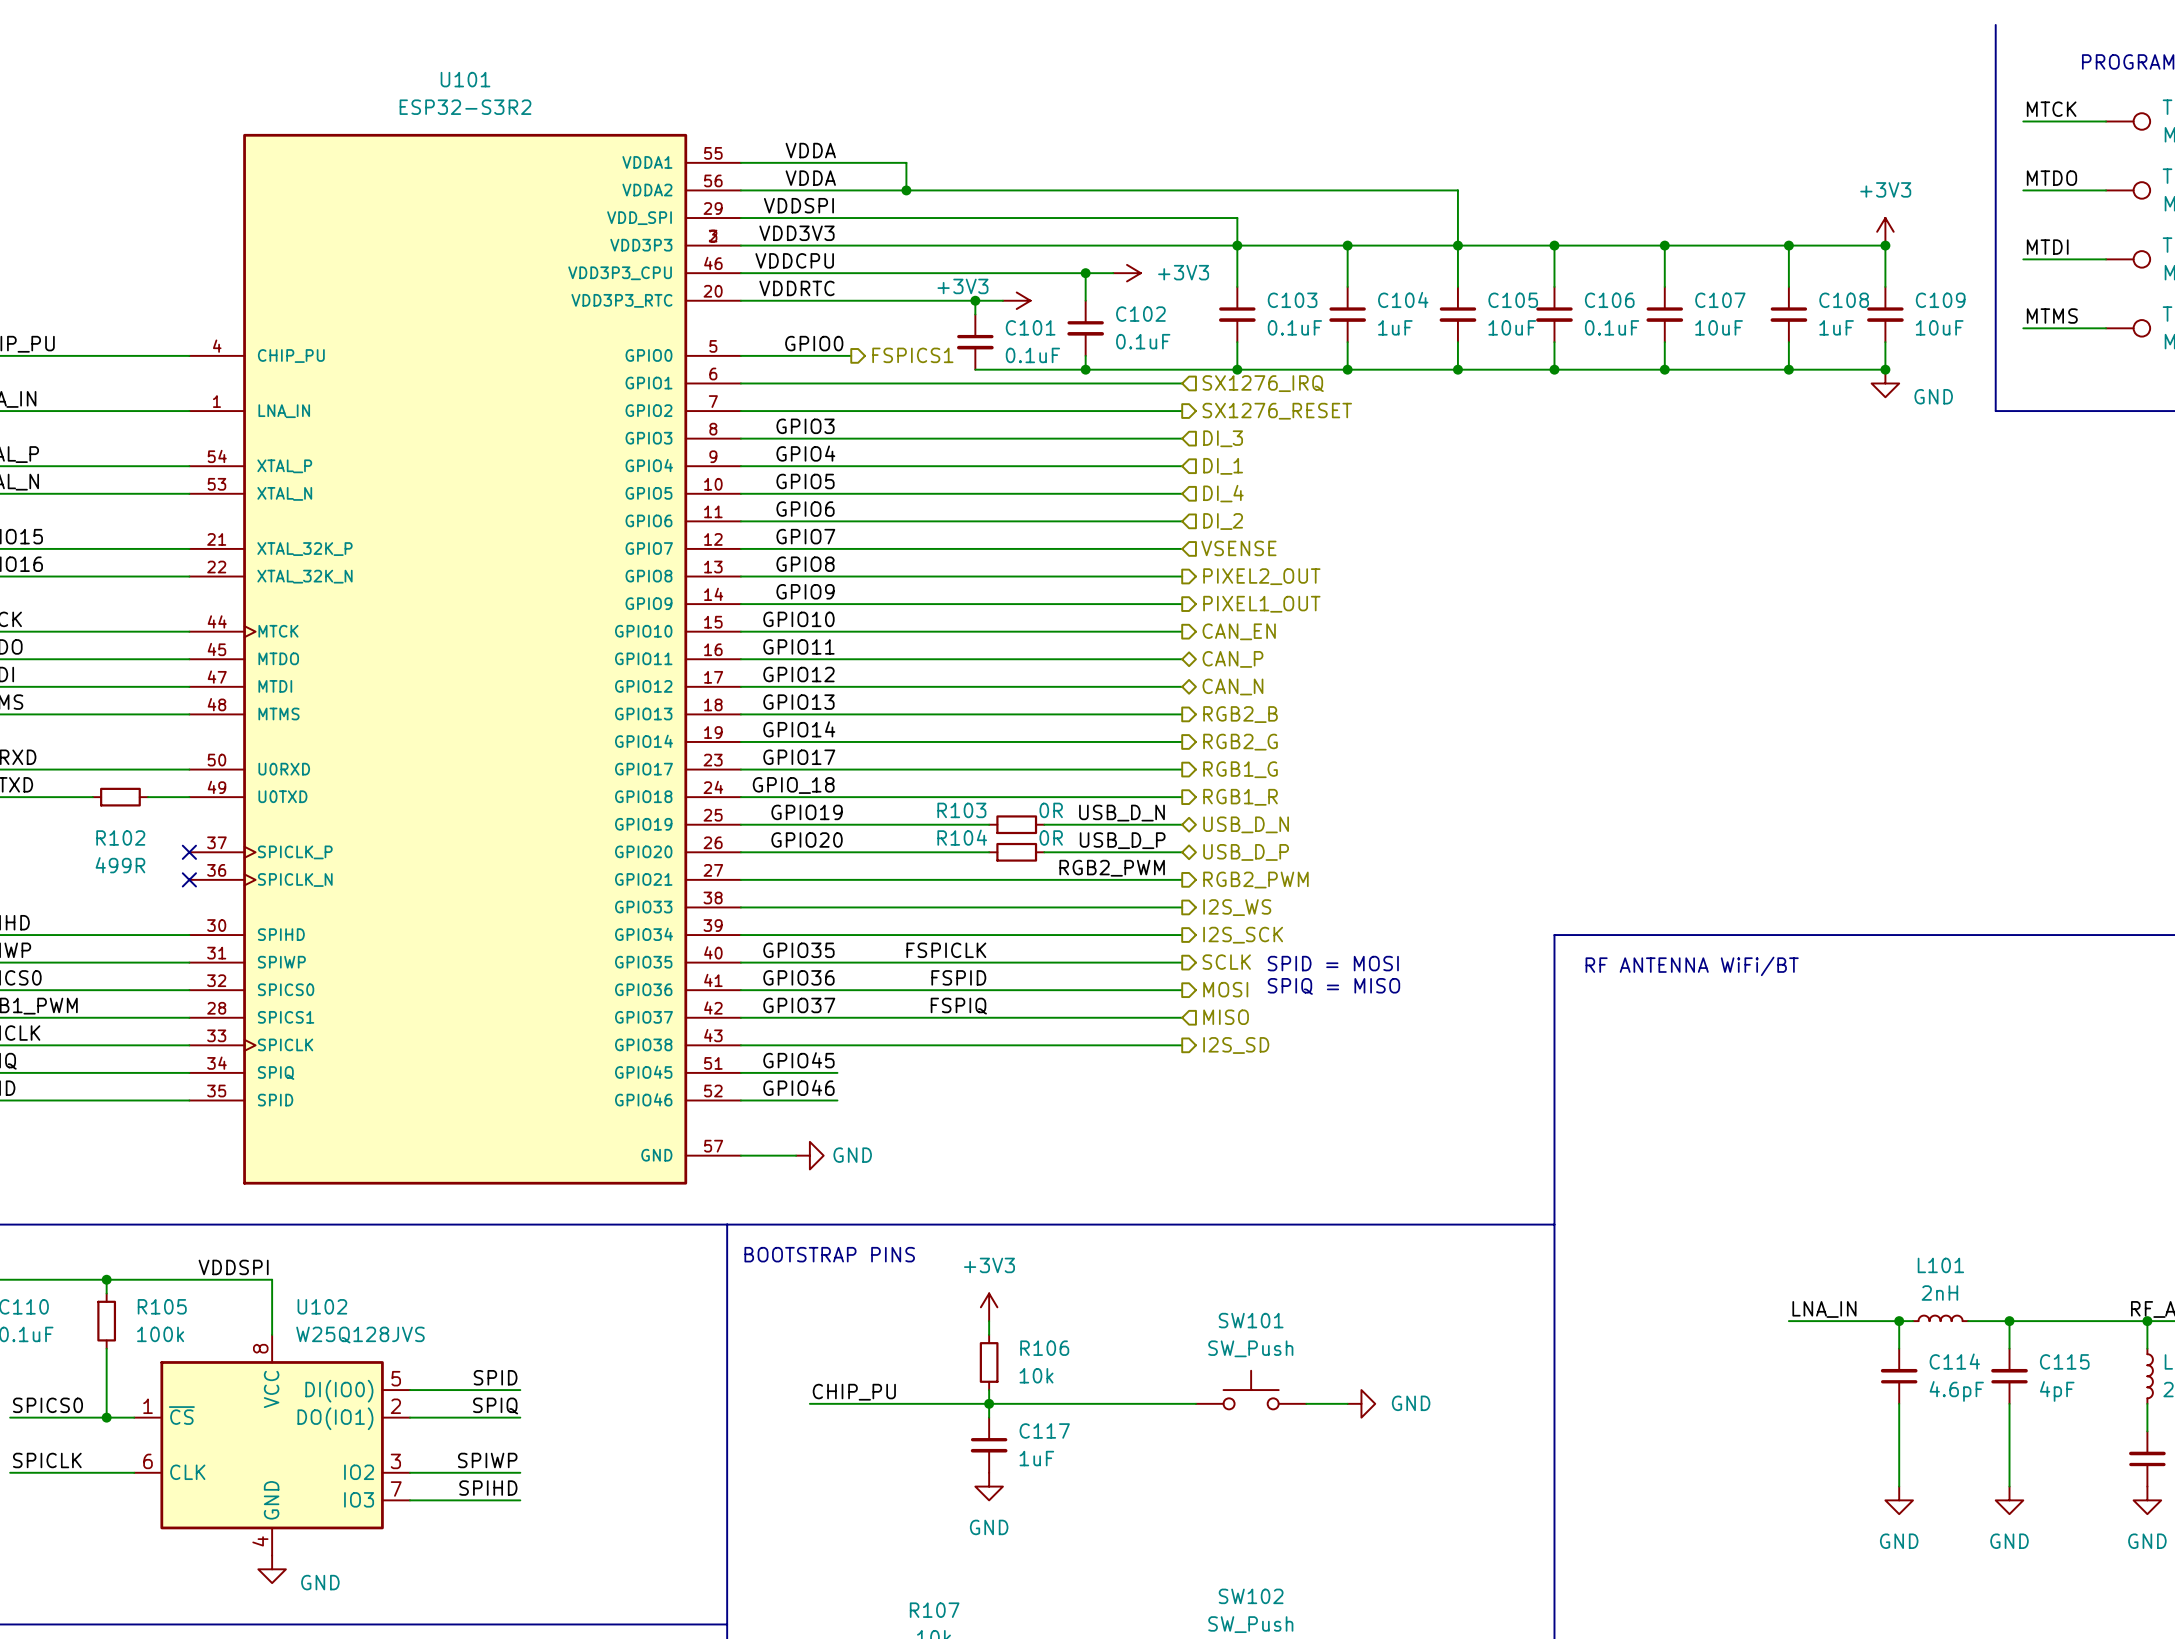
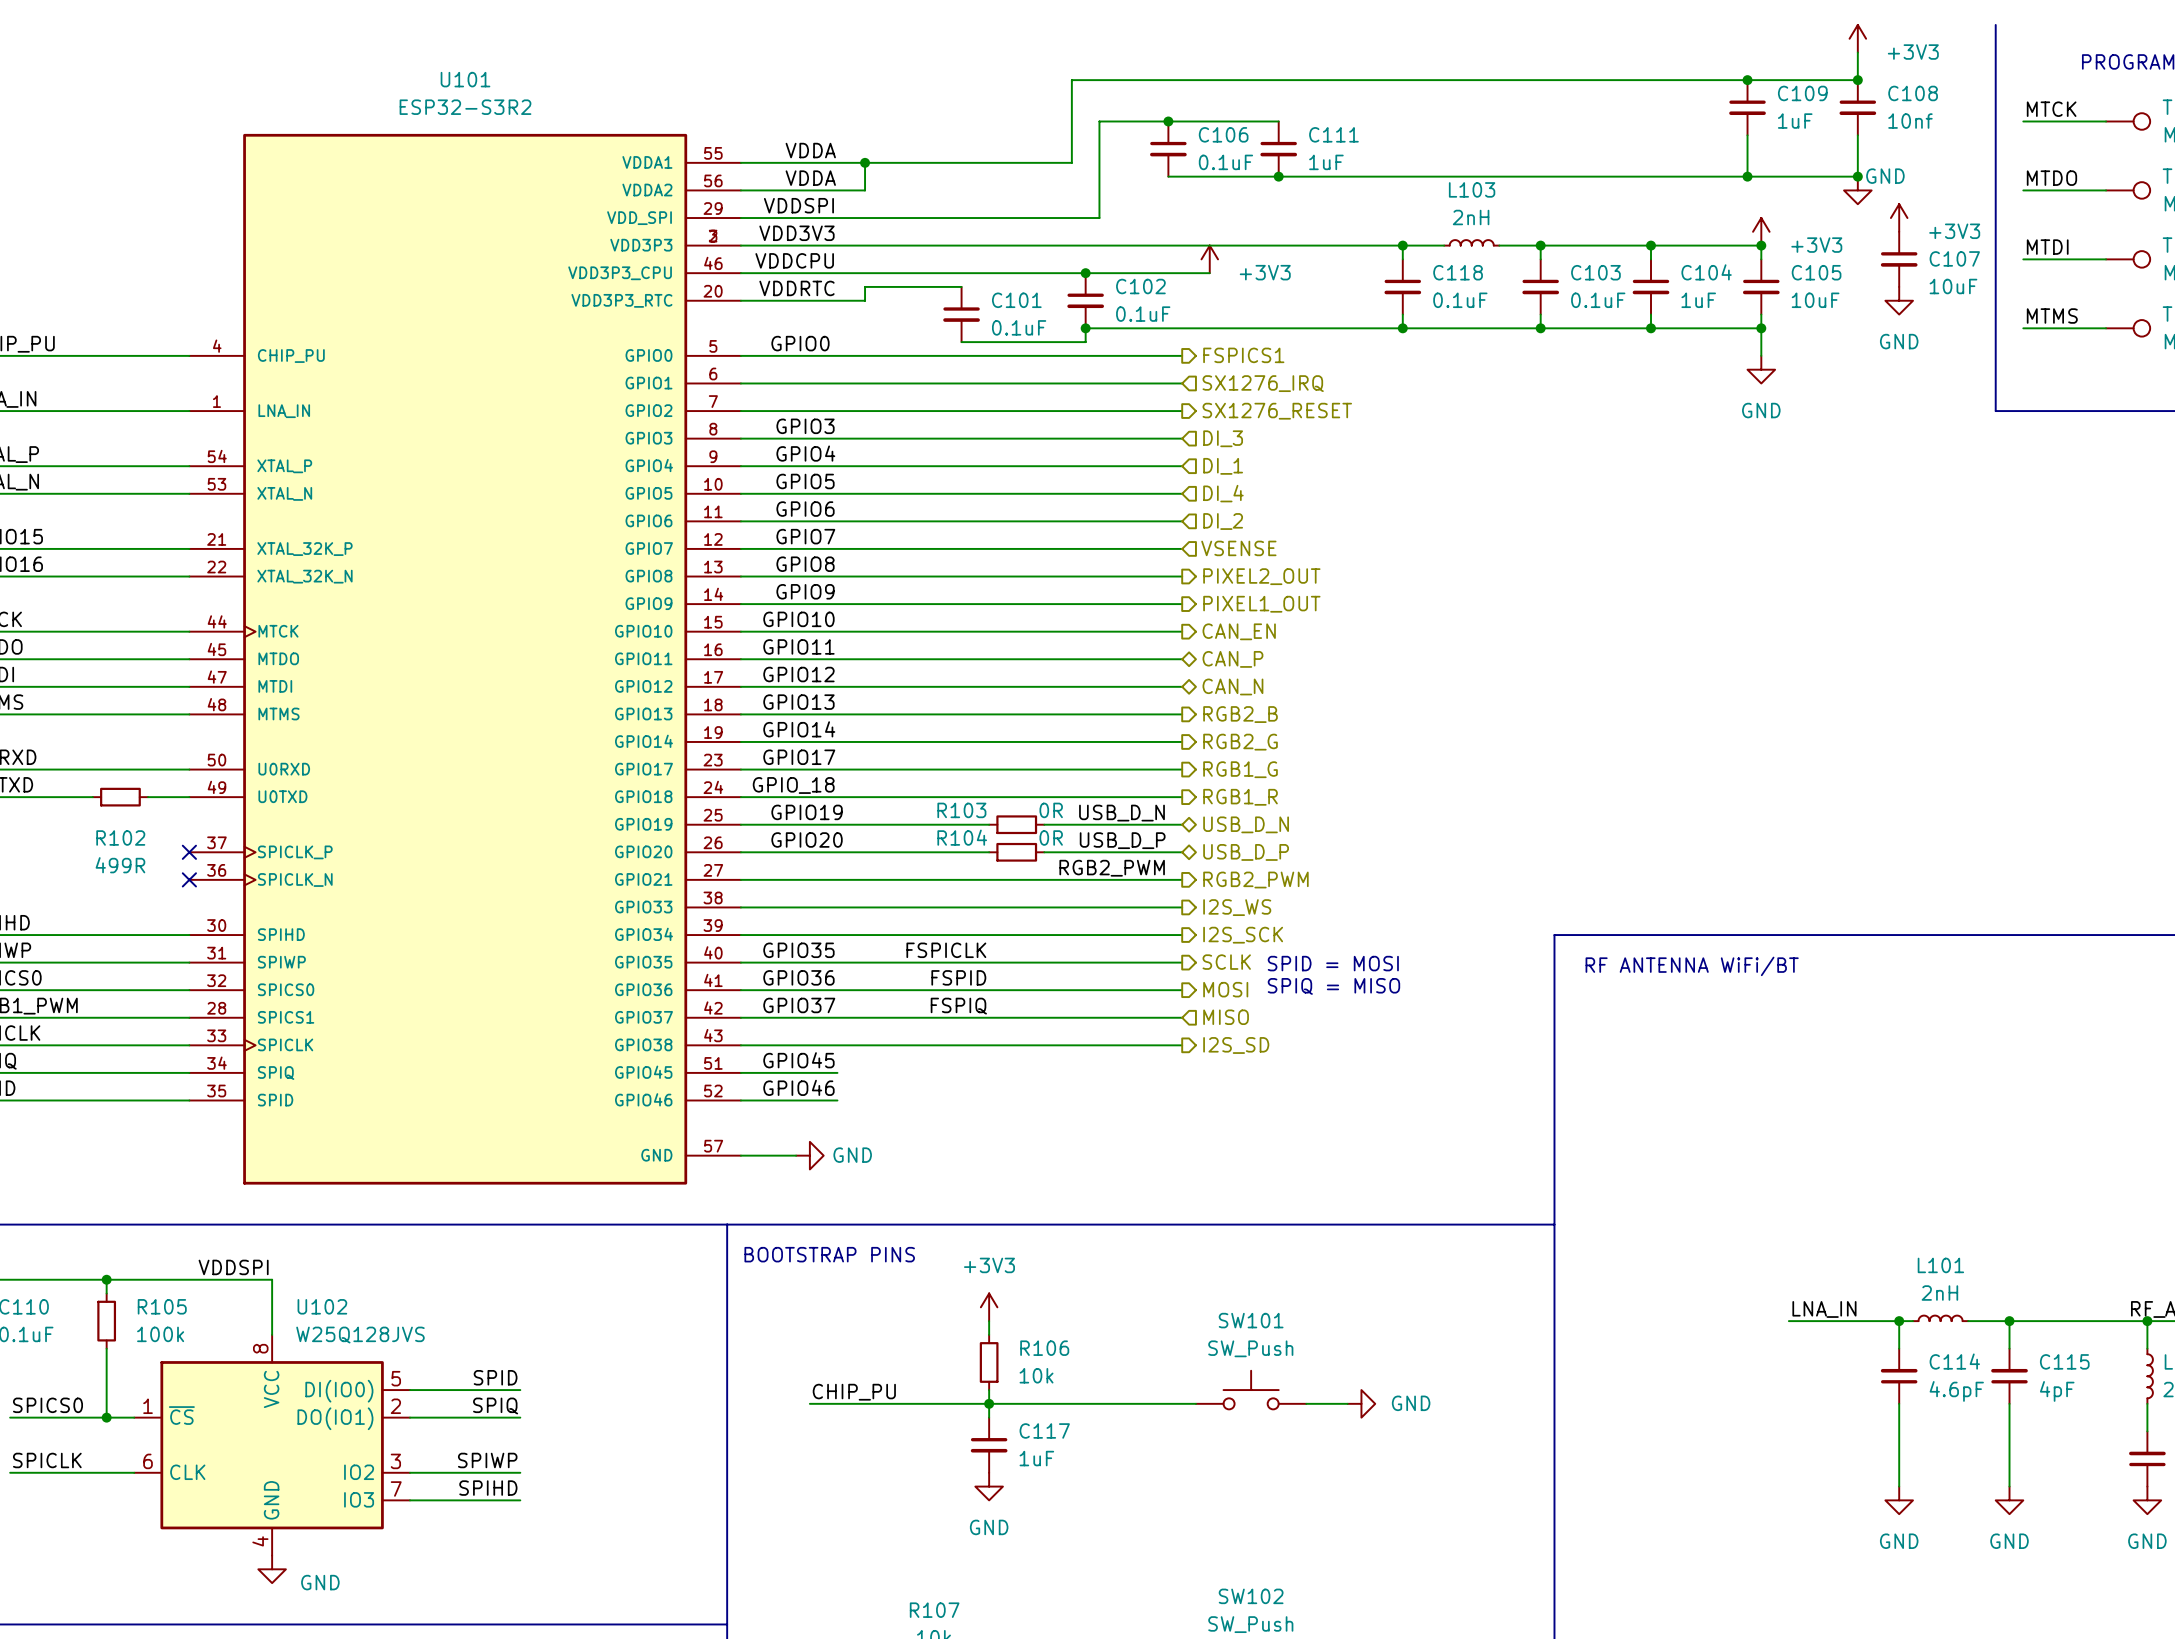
power symbol: none -> +3V3 (1857, 38)
junction: none -> (1747, 80)
junction: none -> (1857, 80)
junction: none -> (1168, 121)
wire: none -> (1857, 135) (1857, 176) (1168, 176)
C111: none -> 1uF (1278, 149)
wire: (906, 162) (906, 190) -> (906, 162) (1071, 162) (1071, 80) (1857, 80) (1857, 52)
junction: none -> (1278, 176)
junction: none -> (1747, 176)
junction: none -> (1857, 176)
power symbol text position: +3V3 (1885, 189) -> +3V3 (1954, 231)
wire: (865, 190) (1457, 190) (1457, 286) -> (865, 190) (865, 162)
junction position: (906, 190) -> (865, 162)
power symbol: none -> GND (1857, 190)
wire: (1099, 218) (1237, 218) (1237, 286) -> (1099, 218) (1099, 121) (1278, 121)
power symbol: none -> +3V3 (1761, 231)
power symbol position: +3V3 (1885, 231) -> +3V3 (1899, 218)
L103: none -> 2nH (1471, 242)
junction: (1237, 245) -> none
wire: (1347, 245) (1347, 286) -> none
junction: (1347, 245) -> none
wire: none -> (1402, 245) (1402, 259)
junction: none -> (1402, 245)
wire: (1444, 245) (1499, 245) -> none
junction: (1457, 245) -> none
wire: none -> (1540, 245) (1540, 259)
wire: (1554, 245) (1554, 286) -> none
junction position: (1554, 245) -> (1540, 245)
wire: none -> (1651, 245) (1651, 259)
wire: (1664, 245) (1664, 286) -> (1747, 135) (1747, 176)
junction position: (1664, 245) -> (1651, 245)
wire: (1761, 245) (1885, 245) (1885, 286) -> (1761, 245) (1761, 259)
wire: (1788, 245) (1788, 286) -> (1761, 314) (1761, 355)
junction position: (1788, 245) -> (1761, 245)
junction: (1885, 245) -> none
wire: none -> (1113, 273) (1209, 273)
power symbol rotation: 0° (1127, 273) -> 90° counterclockwise (1209, 259)
power symbol position: +3V3 (1127, 273) -> +3V3 (1209, 259)
C118: none -> 0.1uF (1402, 286)
wire: (865, 300) (1002, 300) -> (865, 300) (865, 286) (961, 286)
wire: (975, 300) (975, 314) -> none
junction: (975, 300) -> none
power symbol: +3V3 (1016, 300) -> none
C107 name position: C107 (1720, 300) -> C107 (1954, 258)
power symbol: none -> GND (1899, 300)
C103 position: (1237, 314) -> (1540, 286)
C104 position: (1347, 314) -> (1651, 286)
wire: none -> (1402, 314) (1402, 328)
C105 position: (1457, 314) -> (1761, 286)
wire: none -> (1540, 314) (1540, 328)
C106 position: (1554, 314) -> (1168, 149)
wire: none -> (1651, 314) (1651, 328)
C107 position: (1664, 314) -> (1899, 259)
C108 position: (1788, 314) -> (1857, 107)
C109 position: (1885, 314) -> (1747, 107)
C107 value position: 10uF (1719, 327) -> 10uF (1953, 286)
C108 value: 1uF (1836, 327) -> 10nf (1910, 121)
C109 value: 10uF (1939, 327) -> 1uF (1795, 121)
C102 position: (1085, 328) -> (1085, 300)
junction: none -> (1402, 328)
junction: none -> (1540, 328)
junction: none -> (1651, 328)
wire: none -> (1761, 328) (1085, 328) (1085, 342) (961, 342)
junction: none -> (1761, 328)
C101 position: (975, 342) -> (961, 314)
wire: (1237, 342) (1237, 369) -> none
wire: (1347, 342) (1347, 369) -> none
wire: (1457, 342) (1457, 369) -> none
wire: (1554, 342) (1554, 369) -> none
wire: (1664, 342) (1664, 369) -> none
wire: (1788, 342) (1788, 369) -> none
wire: (1885, 342) (1885, 369) (975, 369) -> none
label position: GPIO0 (814, 343) -> GPIO0 (800, 343)
wire: none -> (851, 355) (1182, 355)
hierarchical label: FSPICS1 (912, 355) -> none
wire: (1085, 355) (1085, 369) -> none
hierarchical label: none -> FSPICS1 (1243, 355)
junction position: (1085, 369) -> (1085, 328)
junction: (1237, 369) -> none
junction: (1347, 369) -> none
junction: (1457, 369) -> none
junction: (1554, 369) -> none
junction: (1664, 369) -> none
power symbol: none -> GND (1761, 369)
junction: (1788, 369) -> none
junction: (1885, 369) -> none
power symbol: GND (1885, 383) -> none

